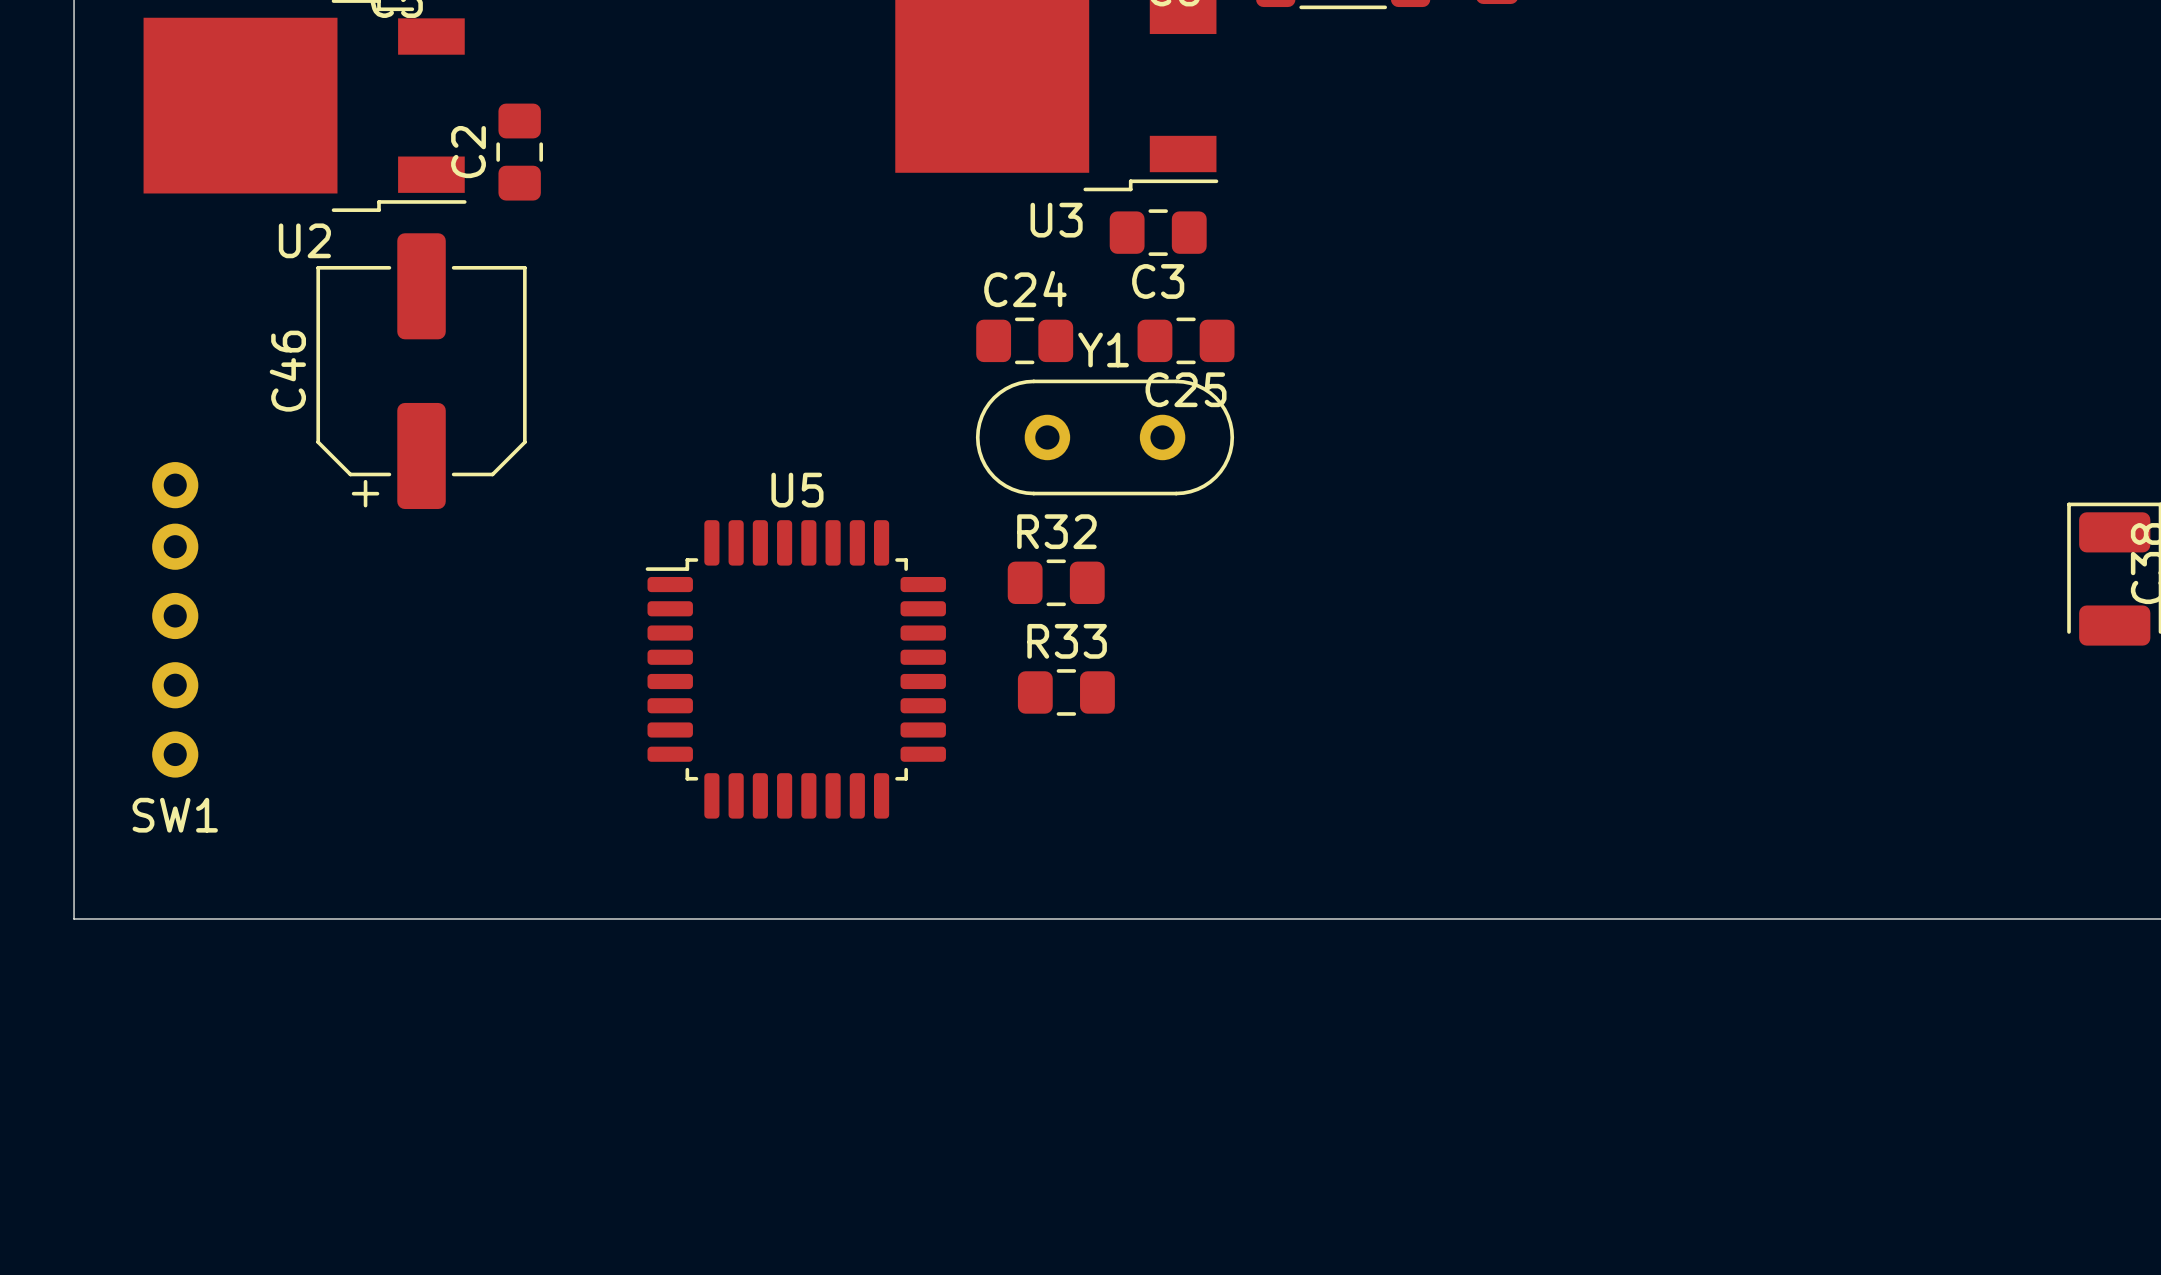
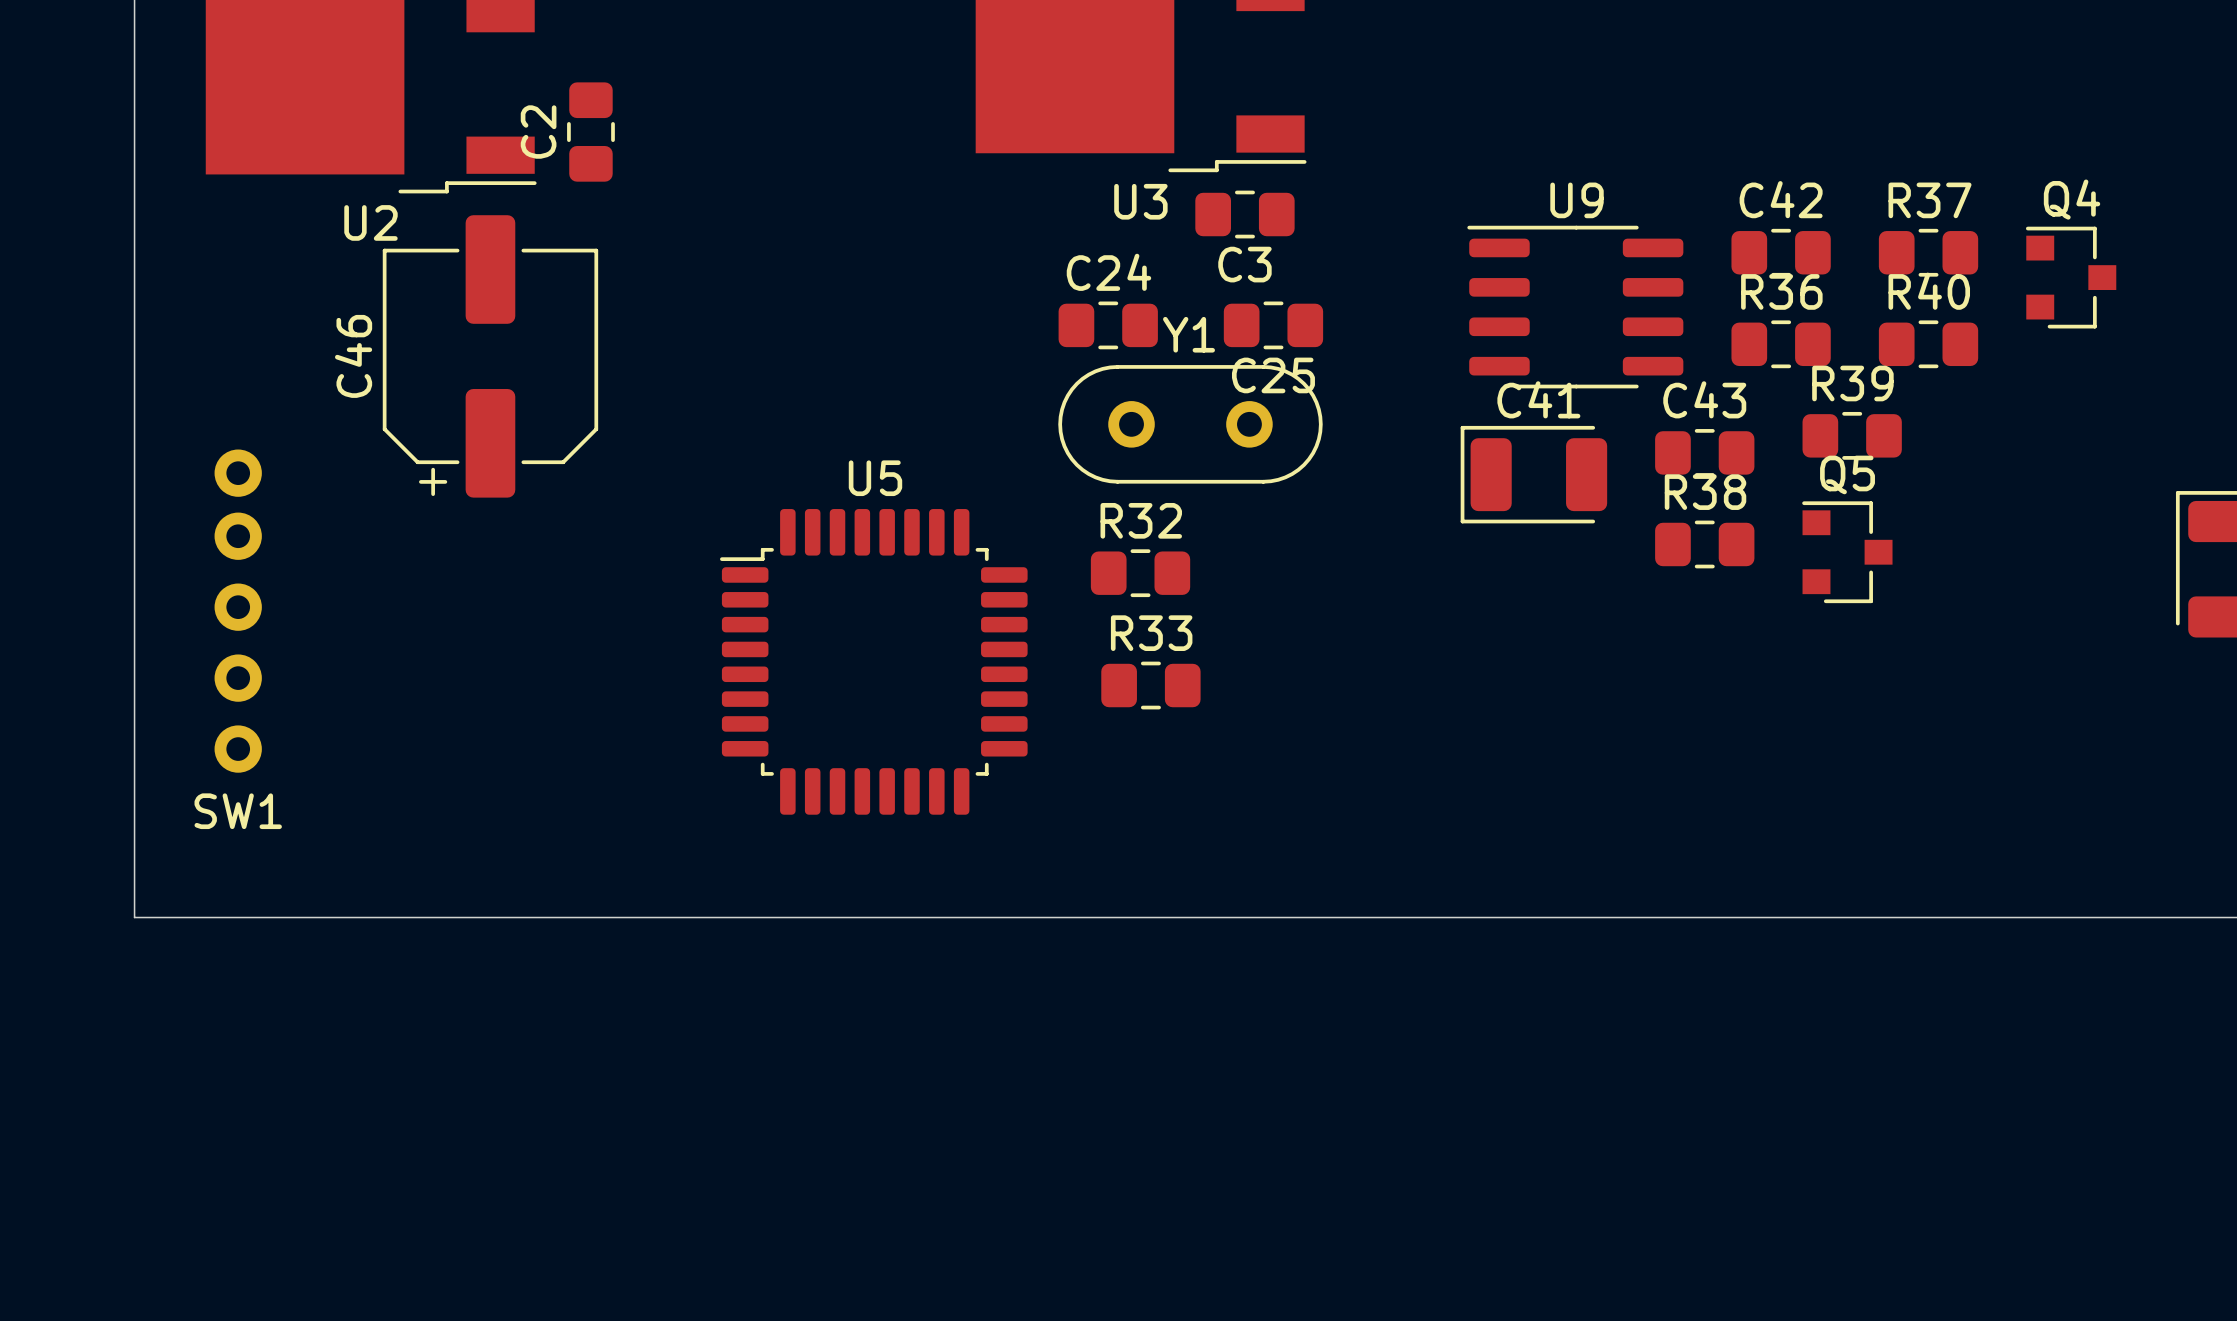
C42: none -> (1781, 252)
R37: none -> (1928, 252)
Q4: none -> (2071, 277)
U9: none -> (1575, 307)
R36: none -> (1781, 344)
R40: none -> (1928, 344)
R39: none -> (1852, 435)
C43: none -> (1704, 452)
C41: none -> (1533, 474)
R38: none -> (1704, 544)
Q5: none -> (1847, 552)

